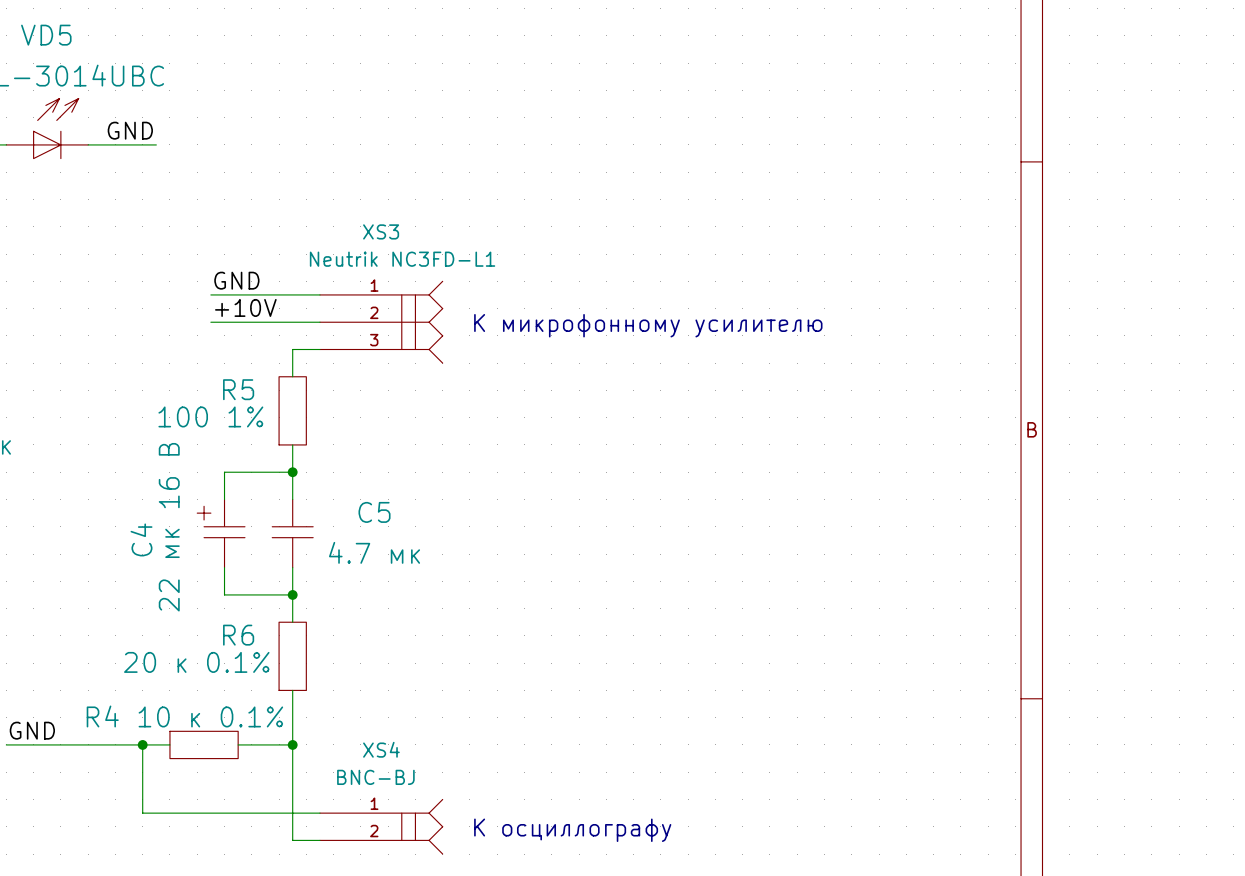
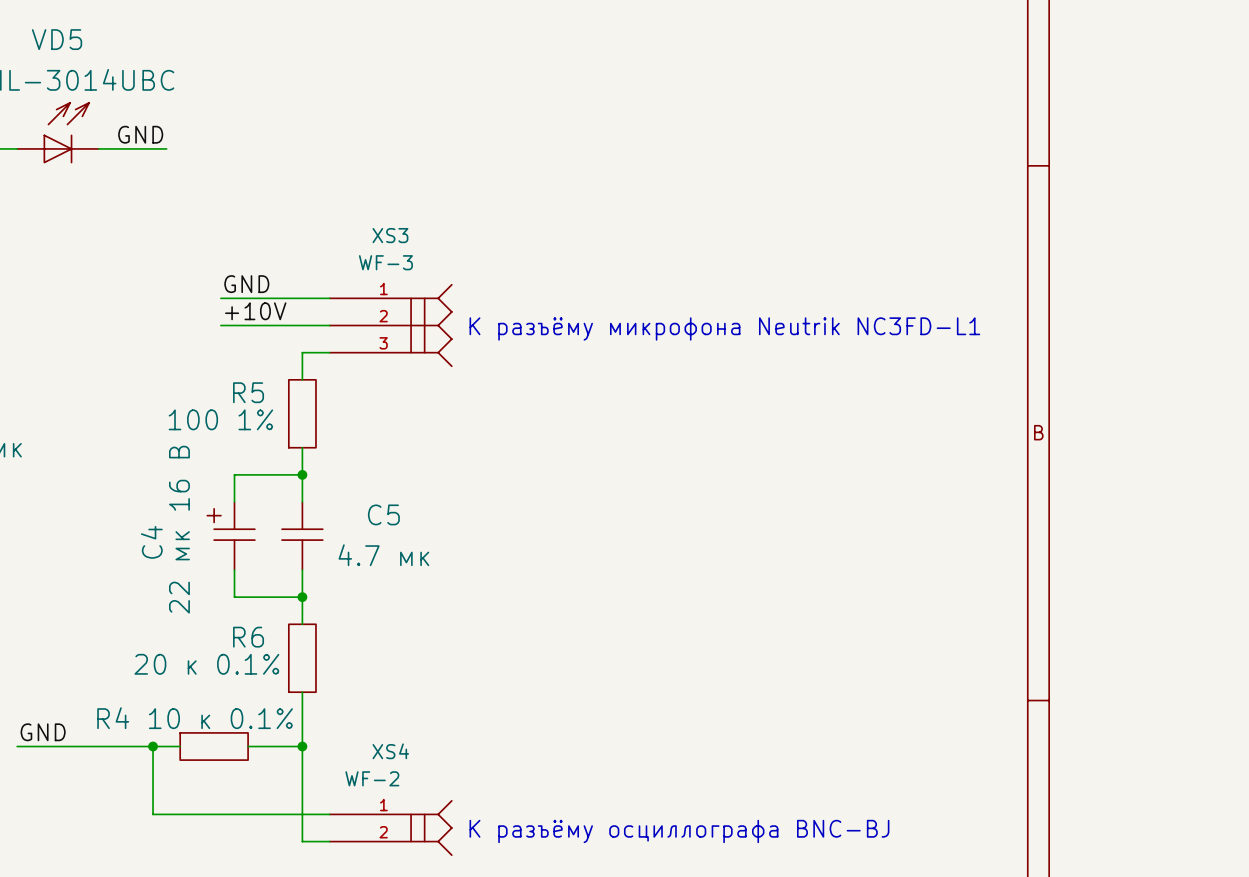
XS3 value: Neutrik NC3FD-L1 (402, 259) -> WF-3 (385, 262)
text: К микрофонному усилителю (648, 325) -> none
text: none -> К разъёму микрофона Neutrik NC3FD-L1 (724, 328)
XS4 value: BNC-BJ (375, 777) -> WF-2 (372, 778)
text: К осциллографу (572, 830) -> К разъёму осциллографа BNC-BJ (679, 831)

